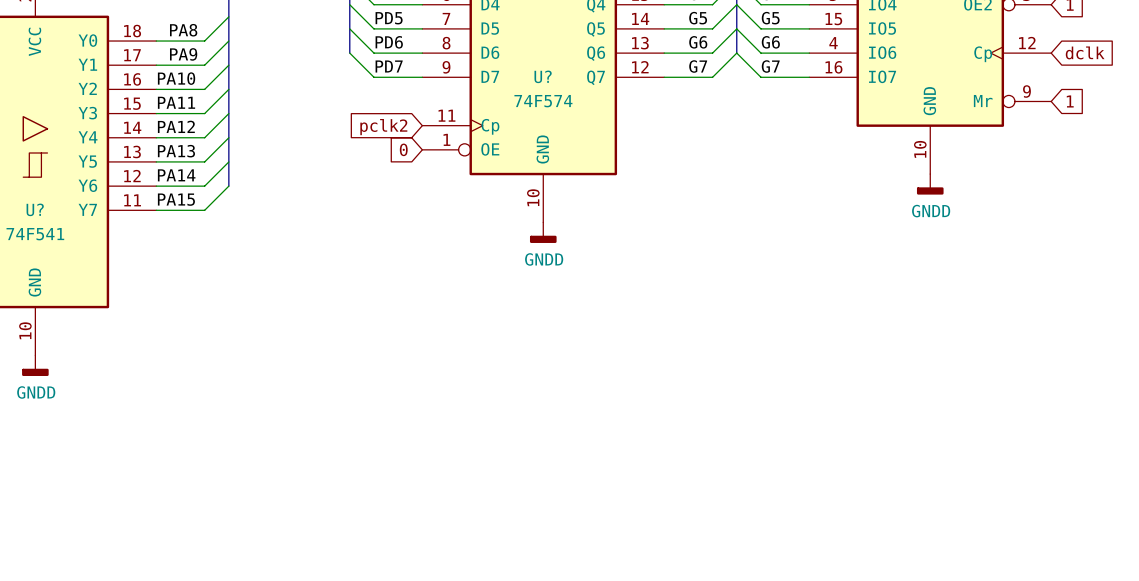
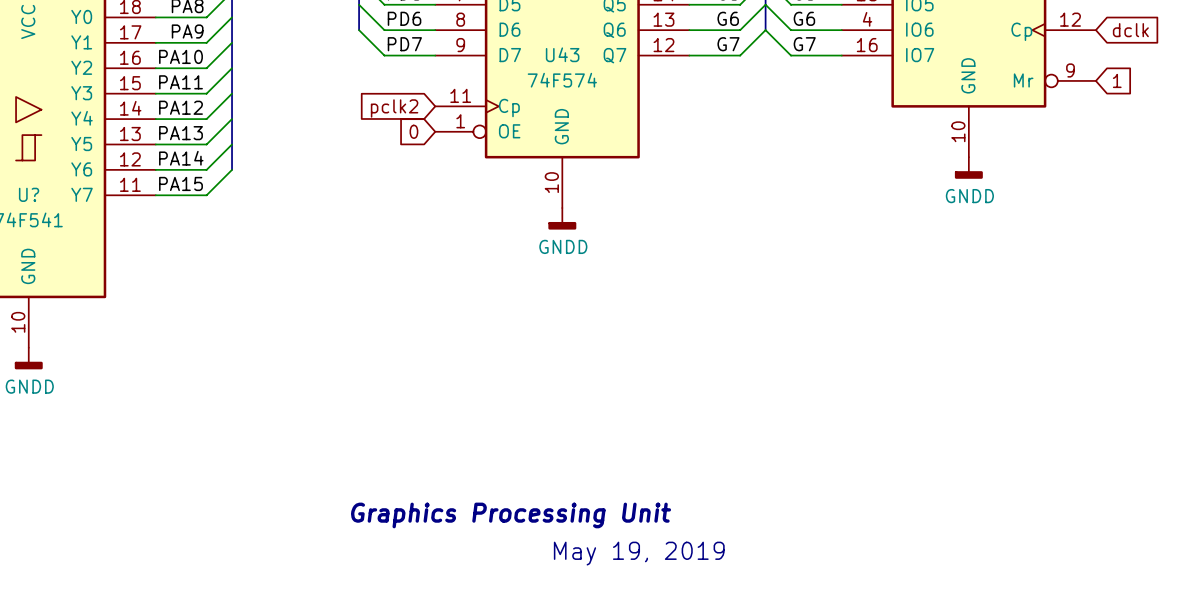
U? name: U? (543, 76) -> U43 (562, 54)
text: none -> Graphics Processing Unit (511, 515)
text: none -> May 19, 2019 (639, 553)

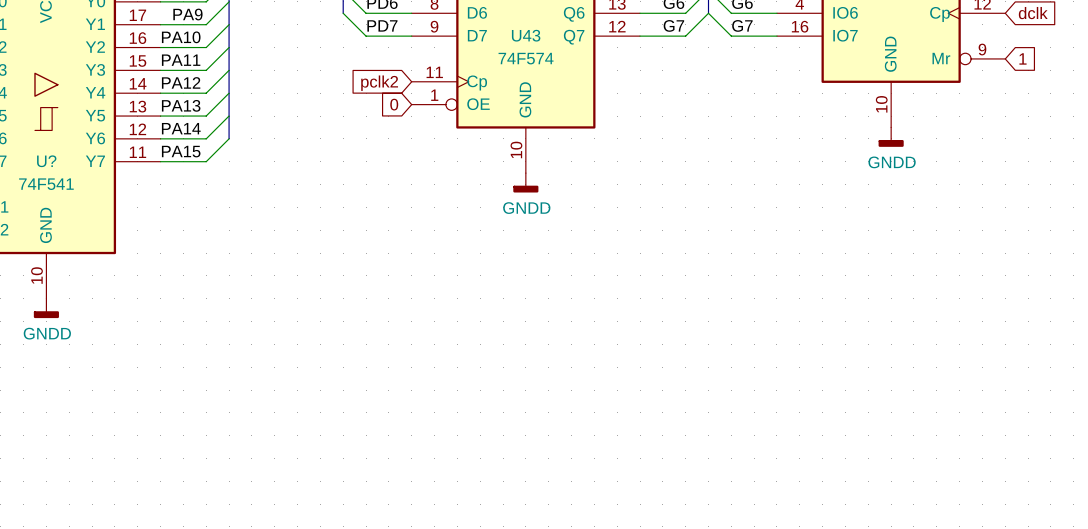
text: Graphics Processing Unit (511, 515) -> none
text: May 19, 2019 (639, 553) -> none

